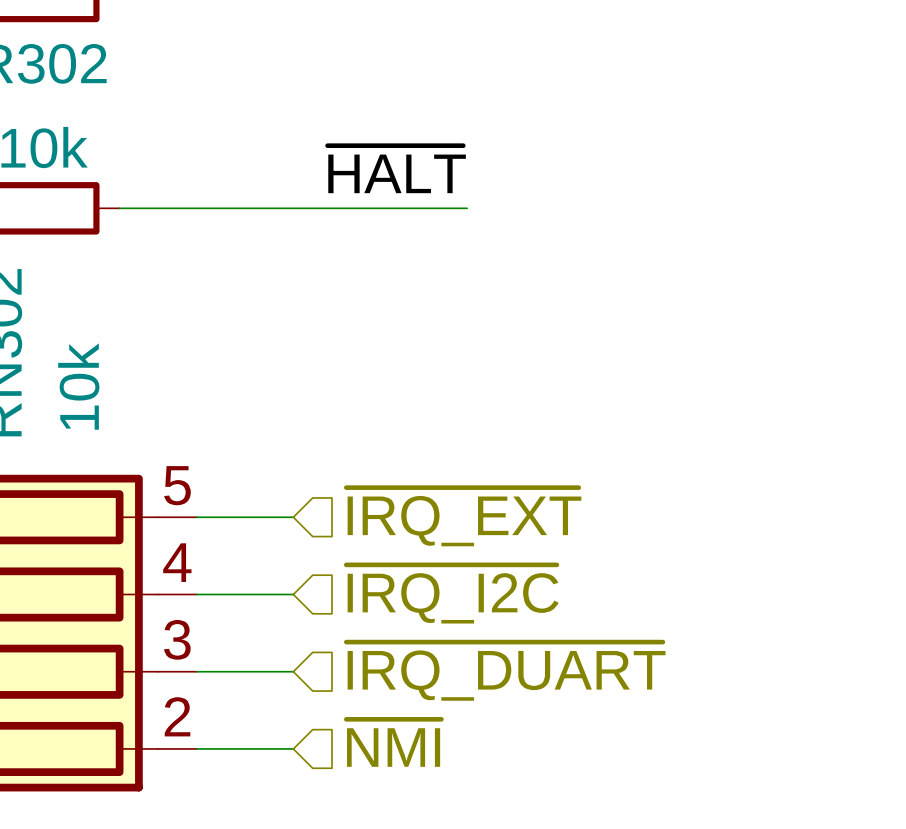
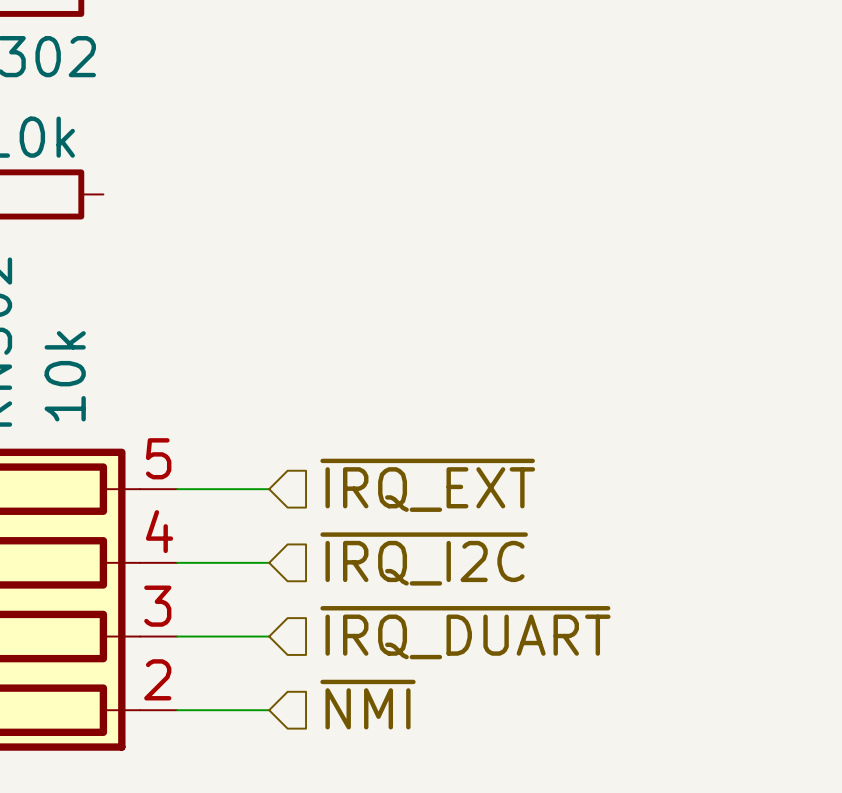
label: ~{HALT} (396, 169) -> none
wire: (119, 208) (467, 208) -> none

